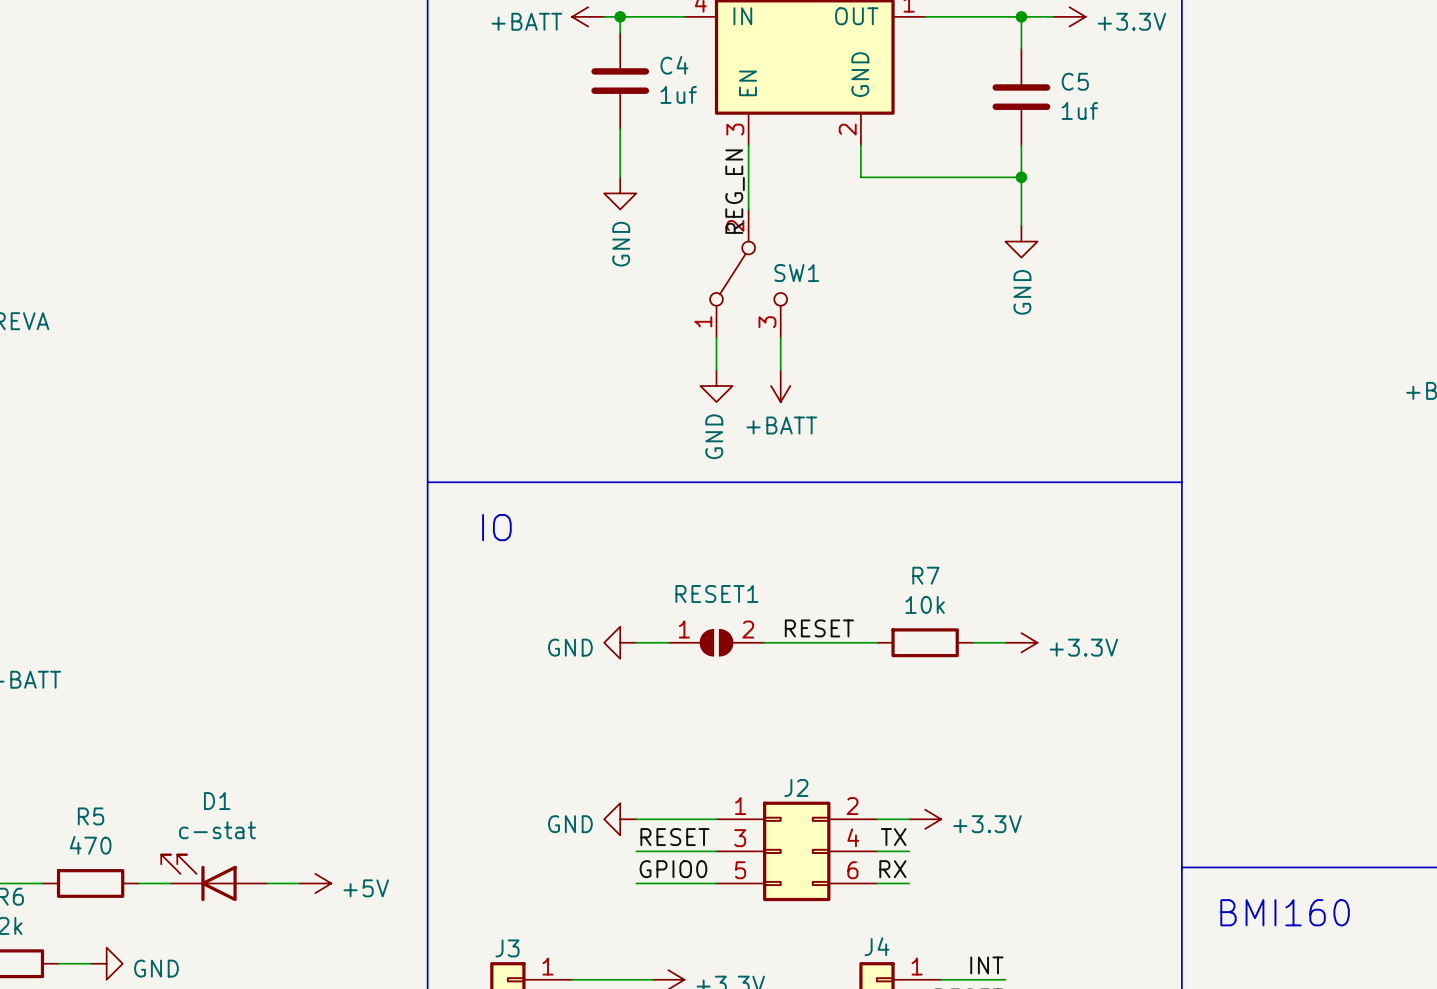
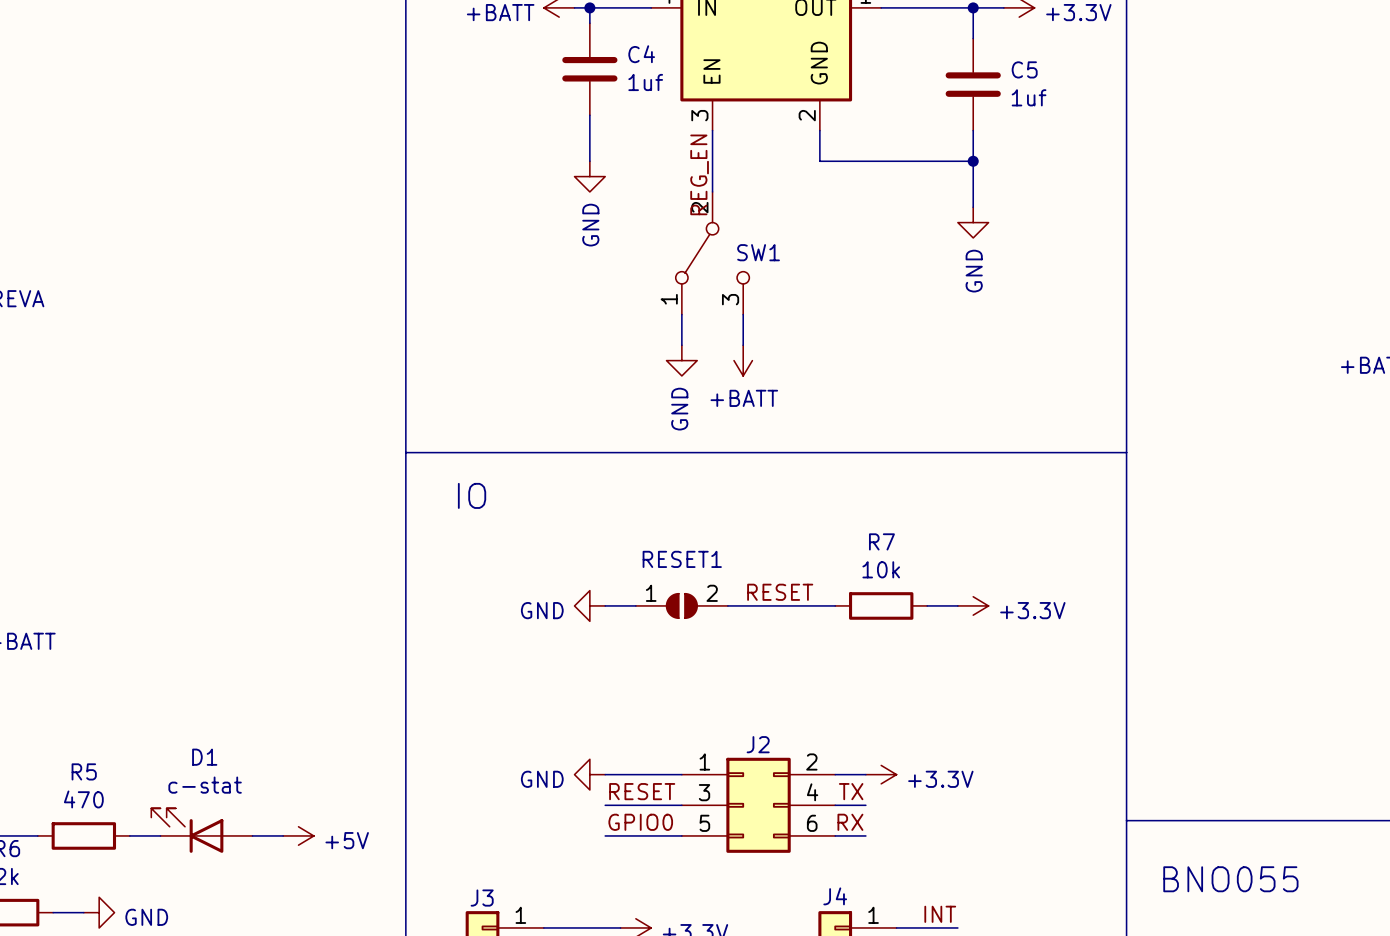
text: BMI160 (1285, 912) -> none
text: none -> BNO055 (1230, 879)

